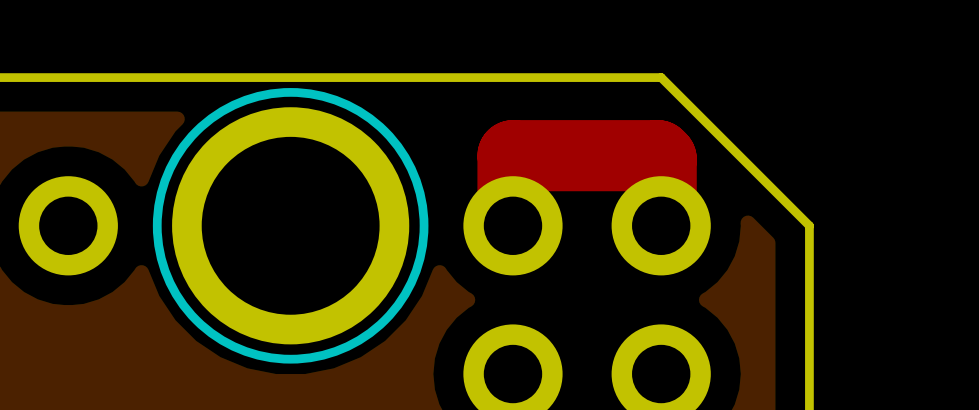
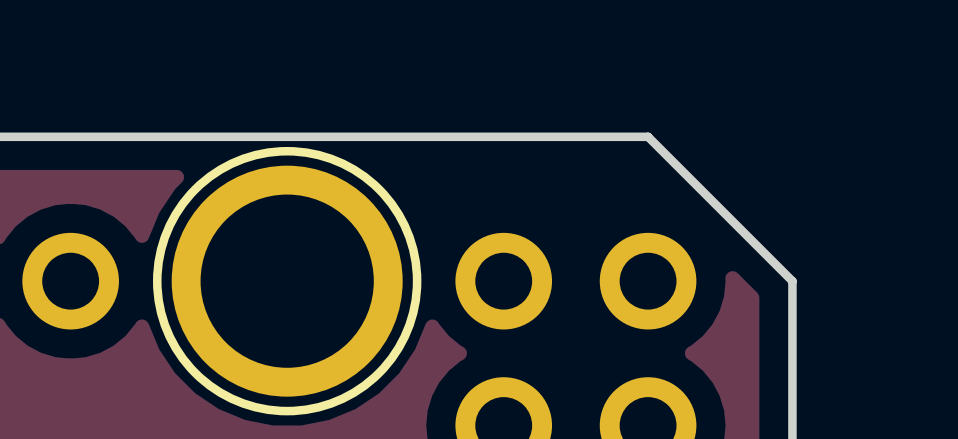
top track: (512, 225) (512, 155) (657, 155) (661, 159) (661, 225) -> none

